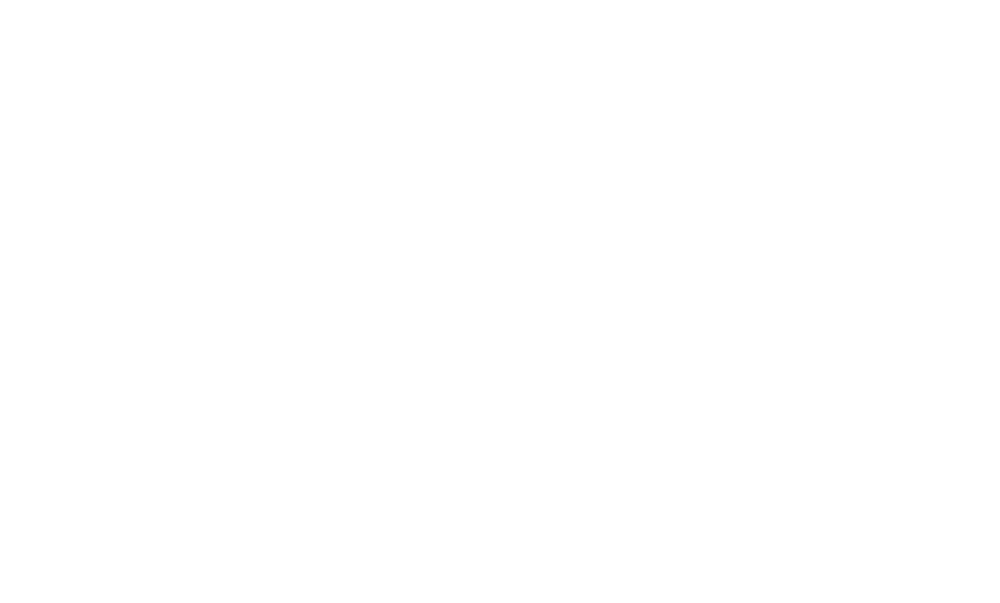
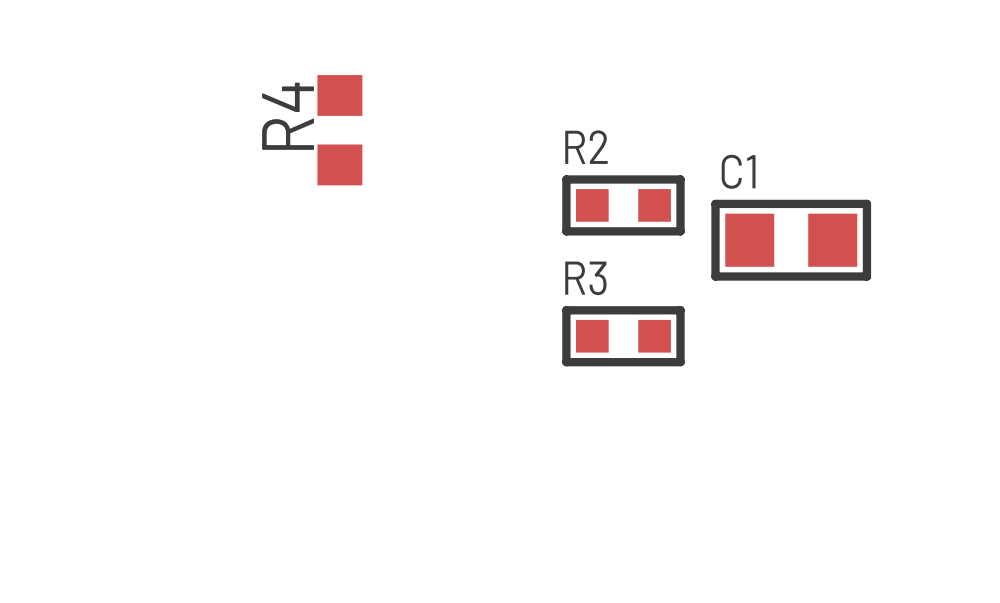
R4: none -> (339, 130)
R2: none -> (623, 205)
C1: none -> (791, 240)
R3: none -> (623, 336)

